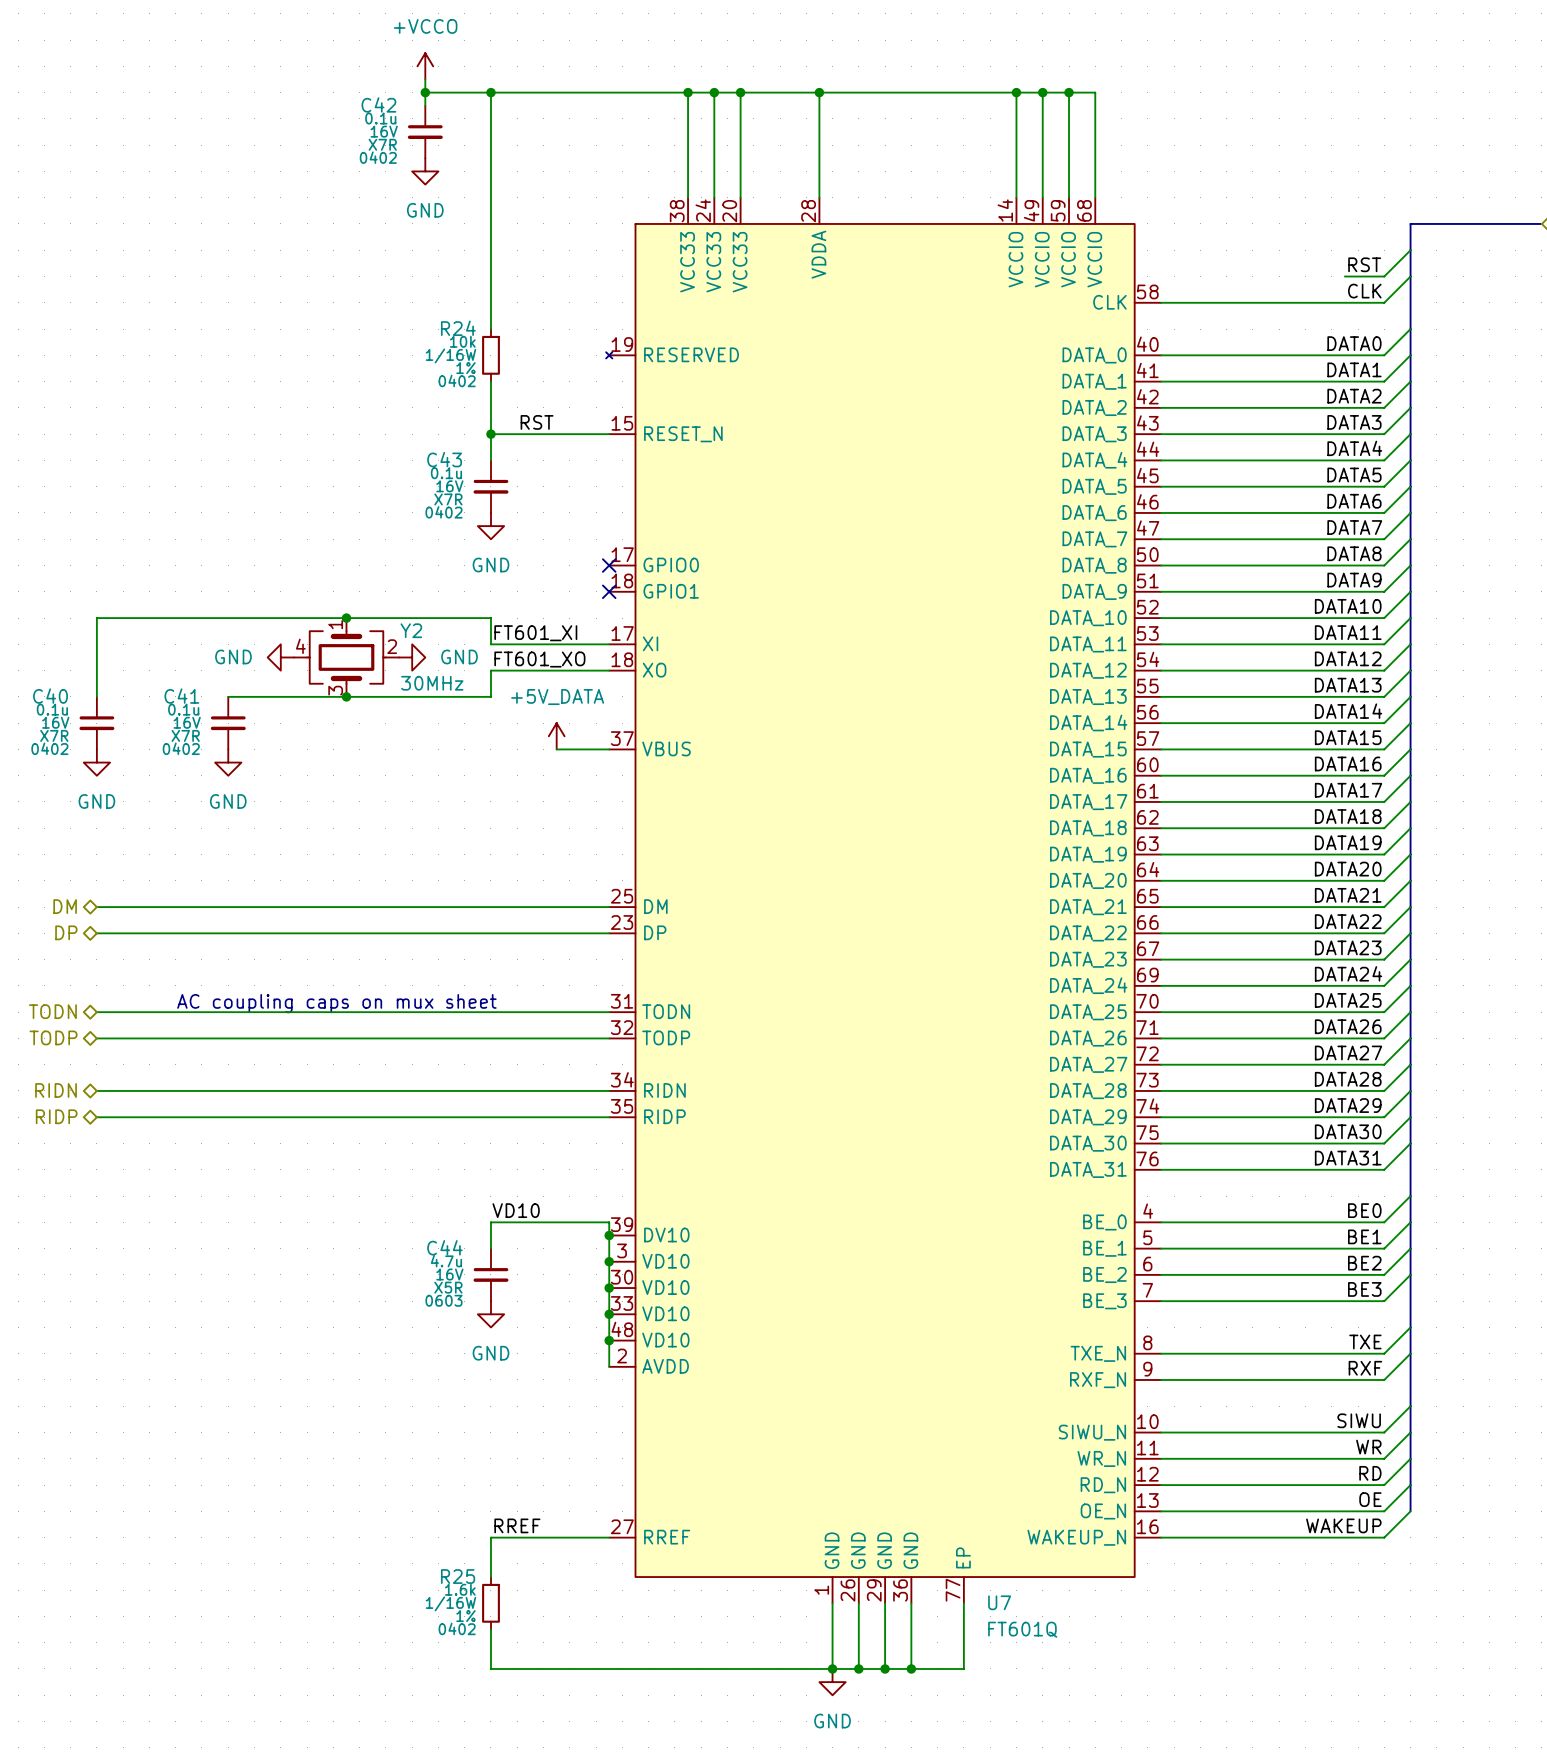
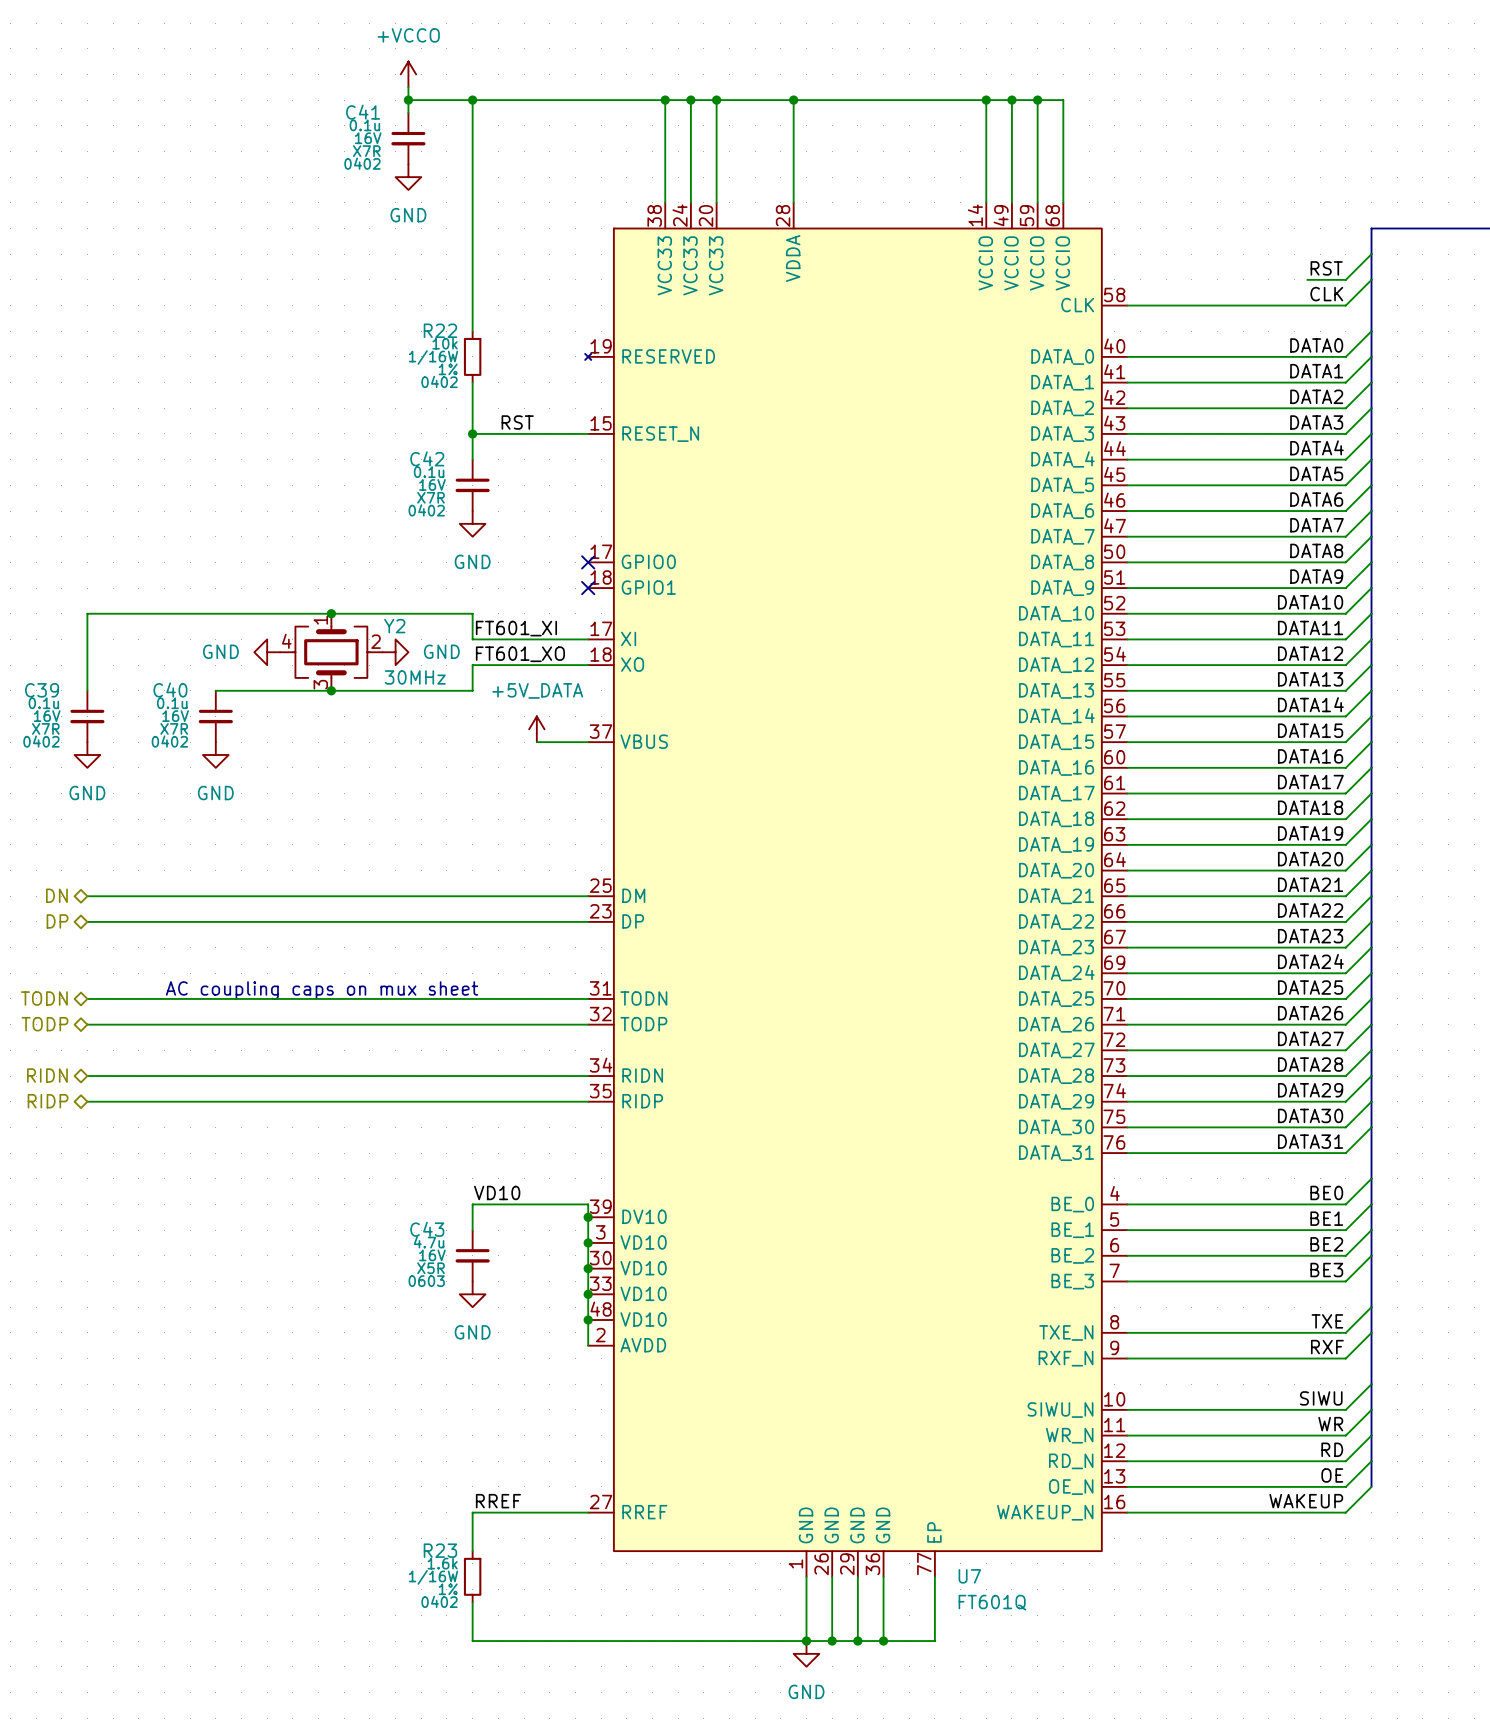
C42 name: C42 (378, 104) -> C41 (363, 112)
R24 name: R24 (458, 328) -> R22 (440, 330)
C43 name: C43 (444, 459) -> C42 (427, 458)
C40 name: C40 (50, 696) -> C39 (42, 690)
C41 name: C41 (181, 696) -> C40 (170, 690)
hierarchical label: DM (65, 906) -> DN (56, 895)
C44 name: C44 (444, 1247) -> C43 (427, 1229)
R25 name: R25 (458, 1576) -> R23 (440, 1550)

